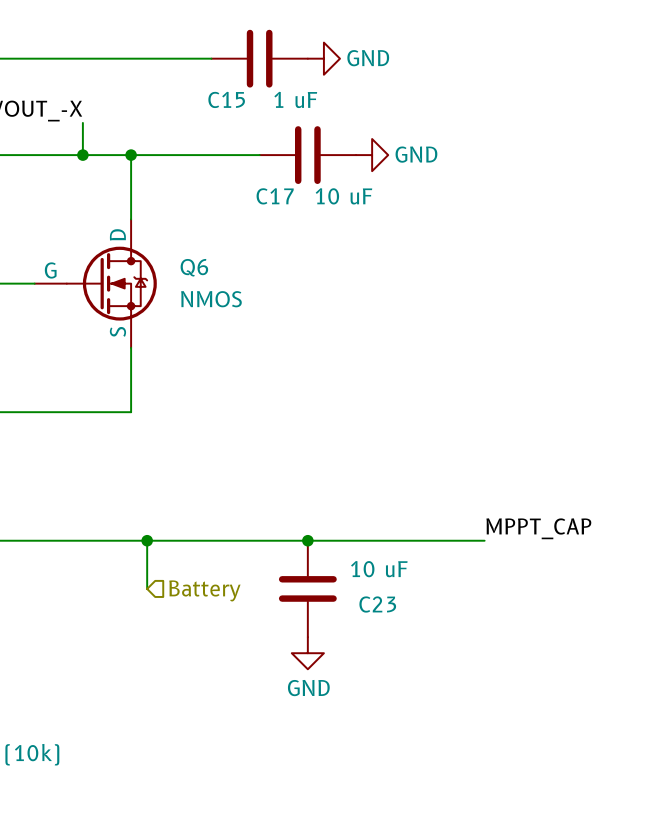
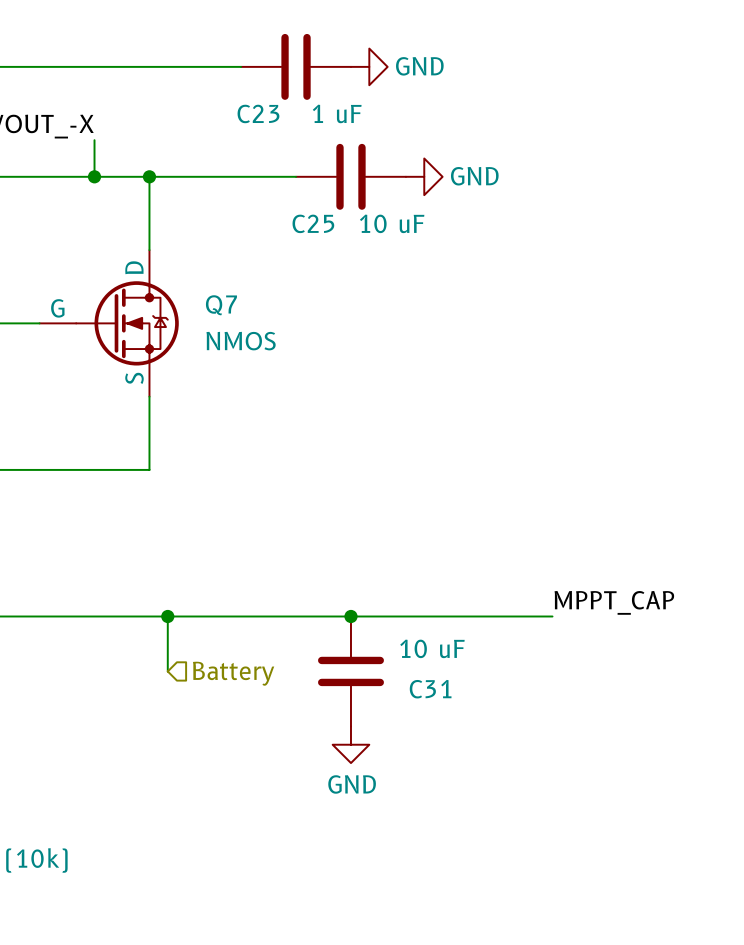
C15 name: C15 (226, 99) -> C23 (258, 113)
C17 name: C17 (275, 196) -> C25 (313, 223)
Q6 name: Q6 (194, 267) -> Q7 (221, 305)
C23 name: C23 (377, 604) -> C31 (430, 689)

